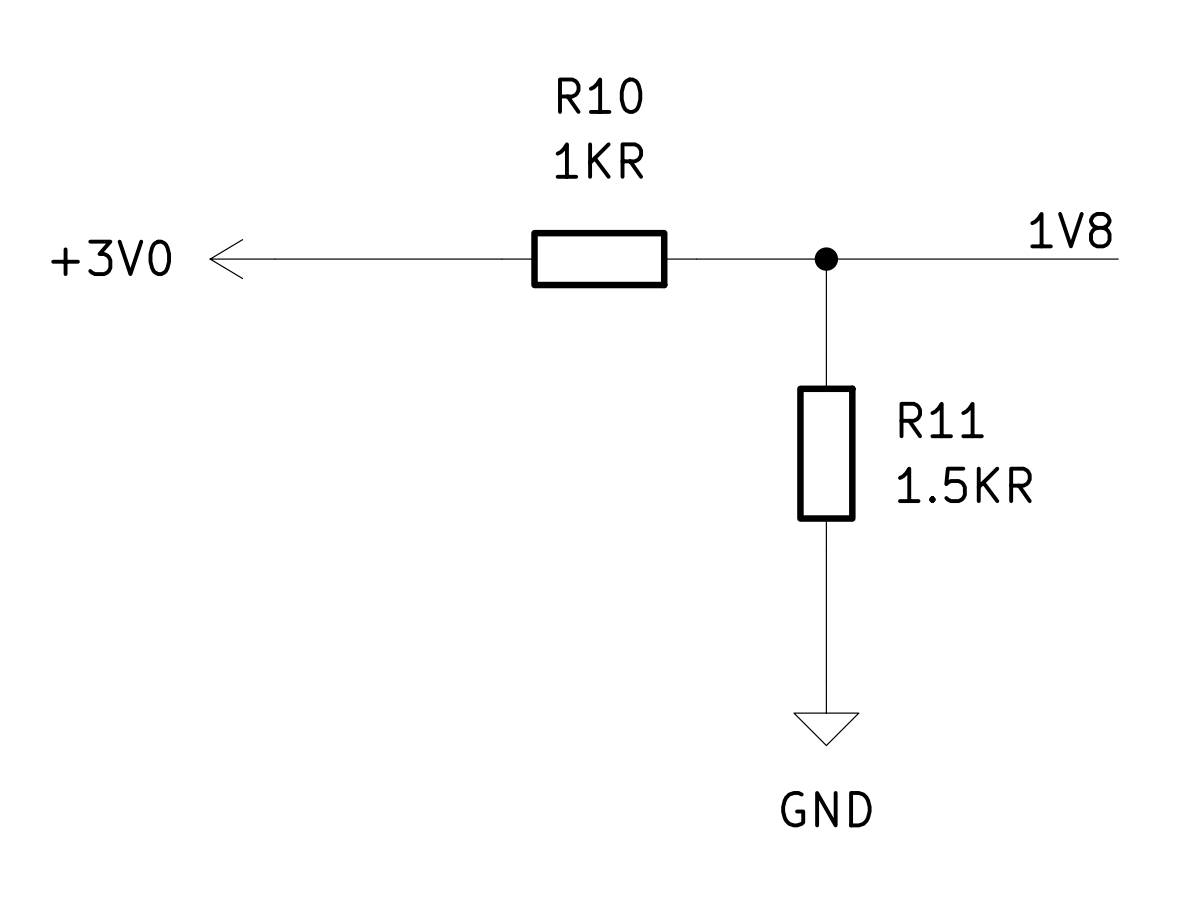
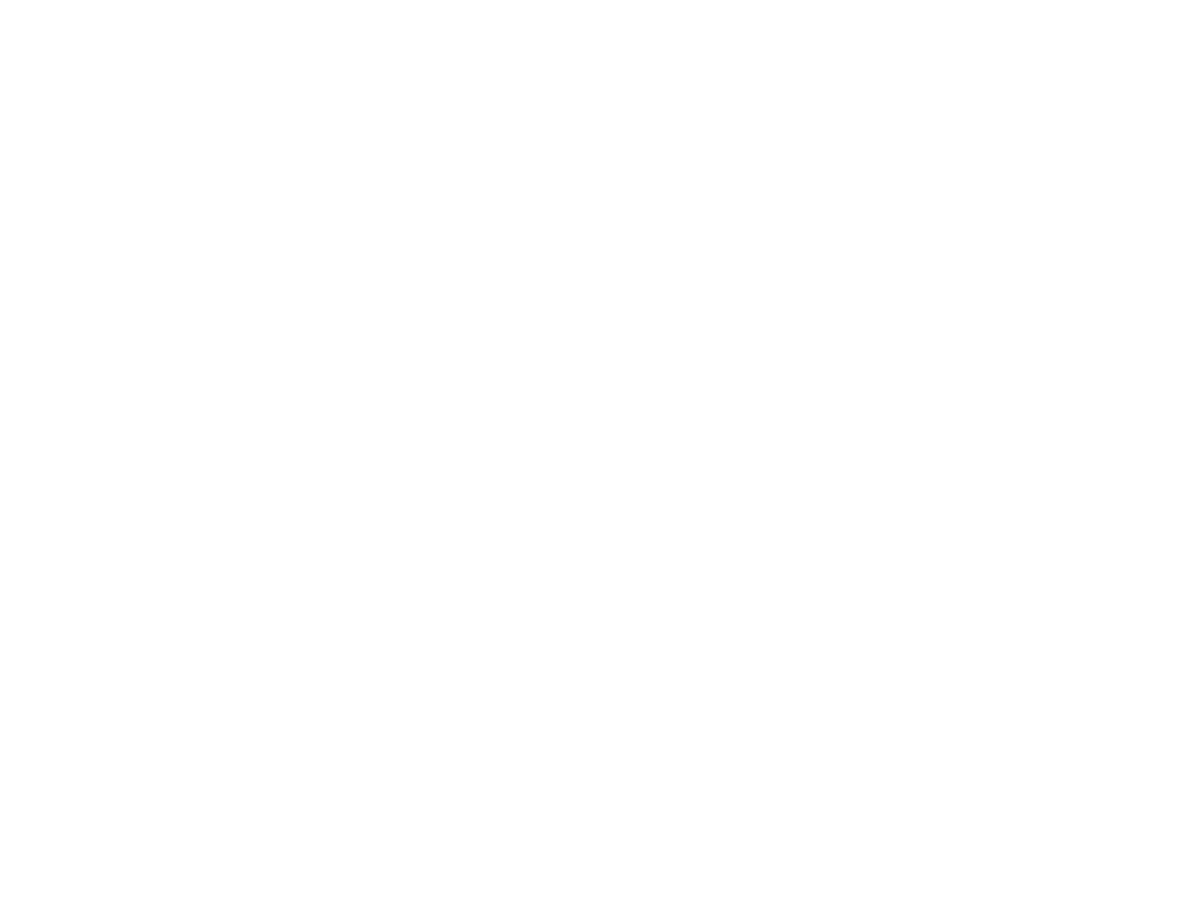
label: 1V8 (1070, 230) -> none
power symbol: +3V0 (242, 259) -> none
wire: (275, 259) (502, 259) -> none
R10: 1KR (599, 259) -> none
wire: (696, 259) (1118, 259) -> none
wire: (826, 259) (826, 356) -> none
junction: (826, 259) -> none
R11: 1.5KR (826, 453) -> none
wire: (826, 550) (826, 680) -> none
power symbol: GND (826, 713) -> none

